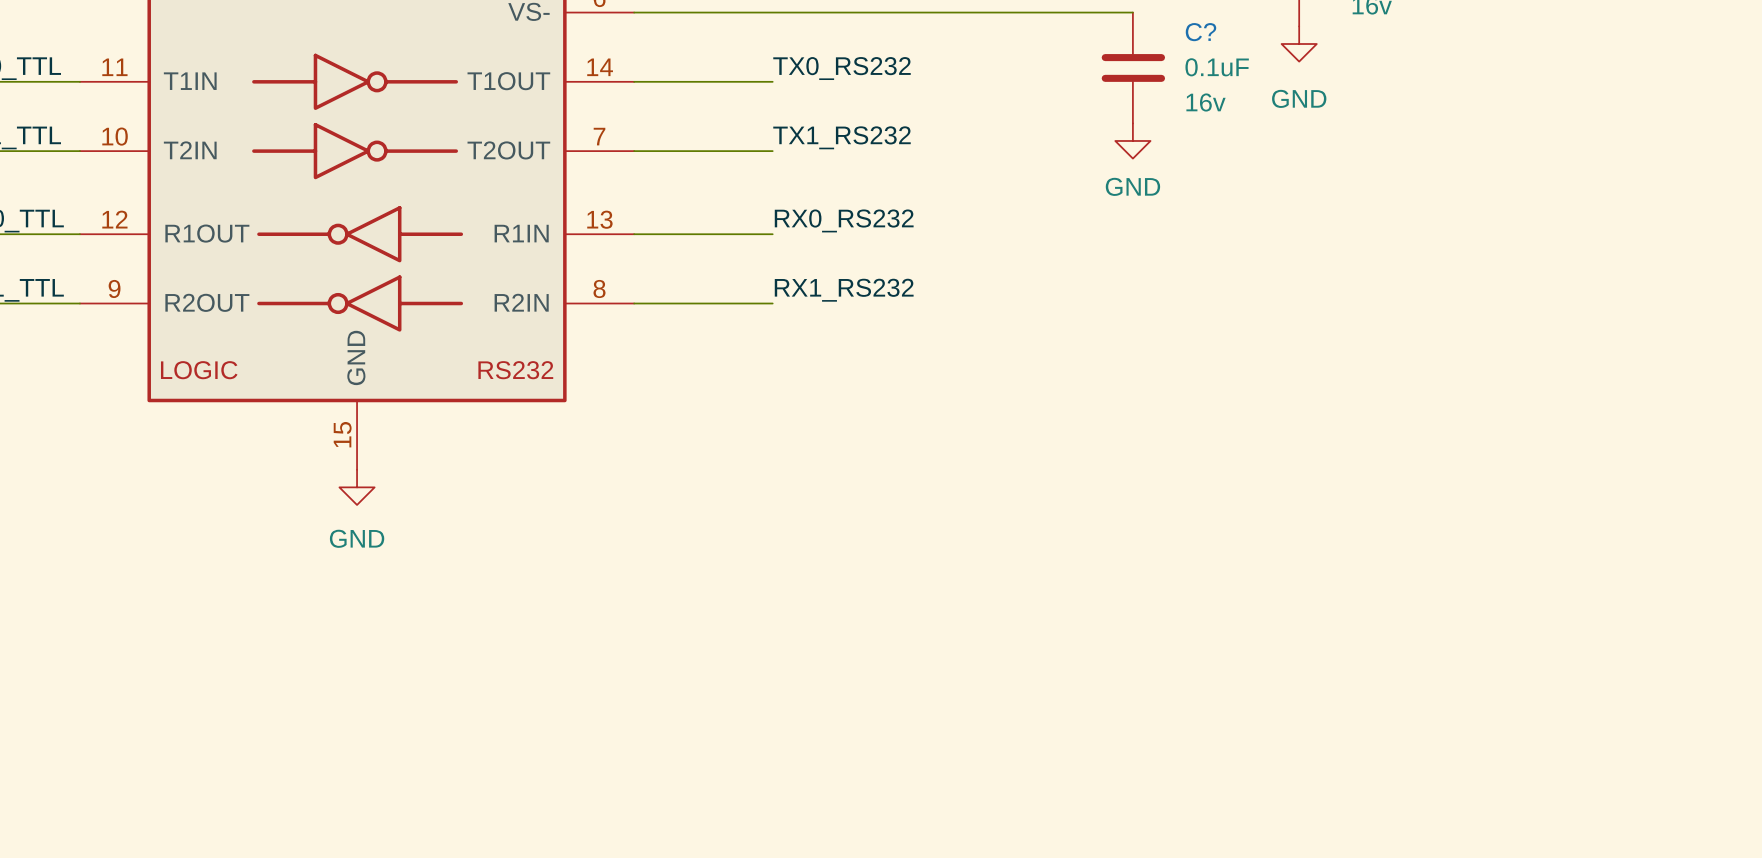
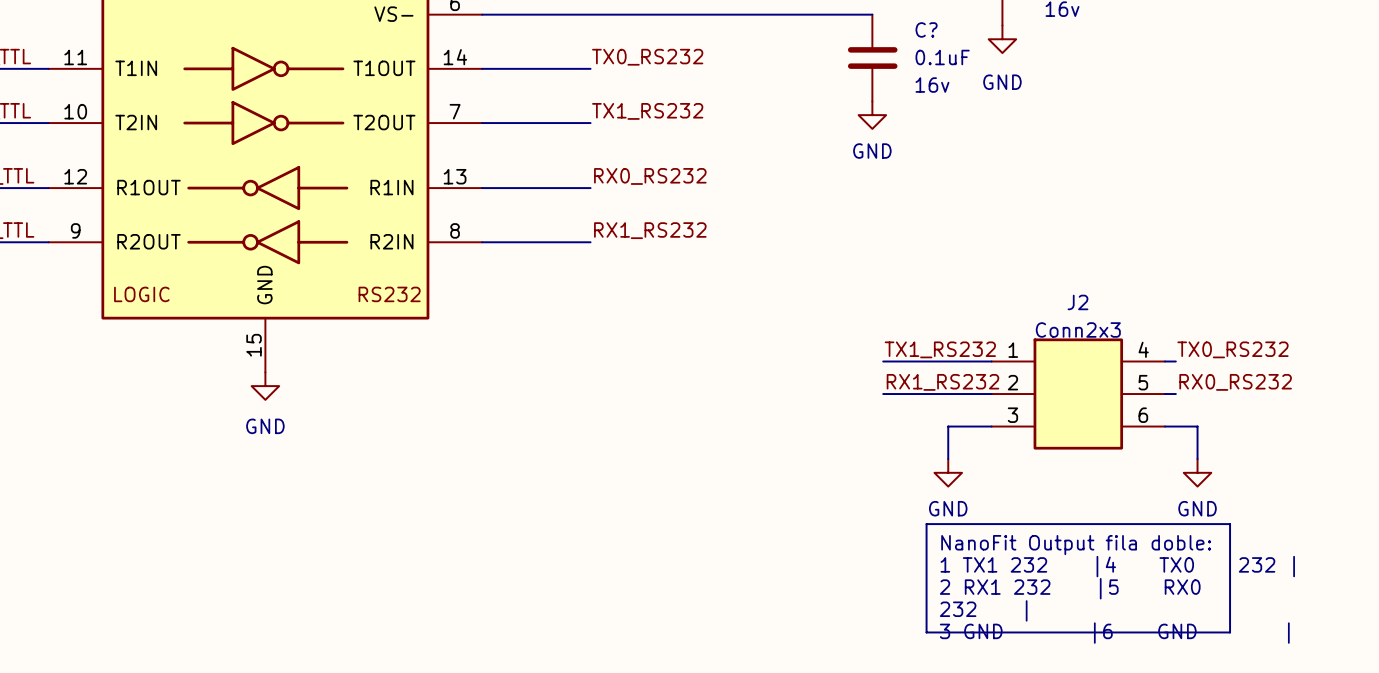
label: none -> TX1_RS232 (940, 349)
label: none -> TX0_RS232 (1232, 349)
wire: none -> (883, 361) (991, 361)
wire: none -> (1165, 361) (1175, 361)
label: none -> RX1_RS232 (942, 382)
label: none -> RX0_RS232 (1235, 382)
wire: none -> (883, 394) (991, 394)
J2: none -> Conn2x3 (1078, 394)
wire: none -> (1165, 394) (1175, 394)
wire: none -> (991, 426) (948, 426) (948, 459)
wire: none -> (1165, 426) (1197, 426) (1197, 459)
power symbol: none -> GND (948, 472)
power symbol: none -> GND (1197, 472)
line: none -> (926, 524) (1230, 524) (1230, 632) (926, 632) (926, 524)
text: none -> NanoFit Output fila doble: (1076, 545)
text: none -> 1 TX1 232 |4 TX0 232 | (1117, 566)
text: none -> 2 RX1 232 |5 RX0 (1070, 588)
text: none -> 232 | (983, 610)
text: none -> 3 GND |6 GND | (1114, 633)

